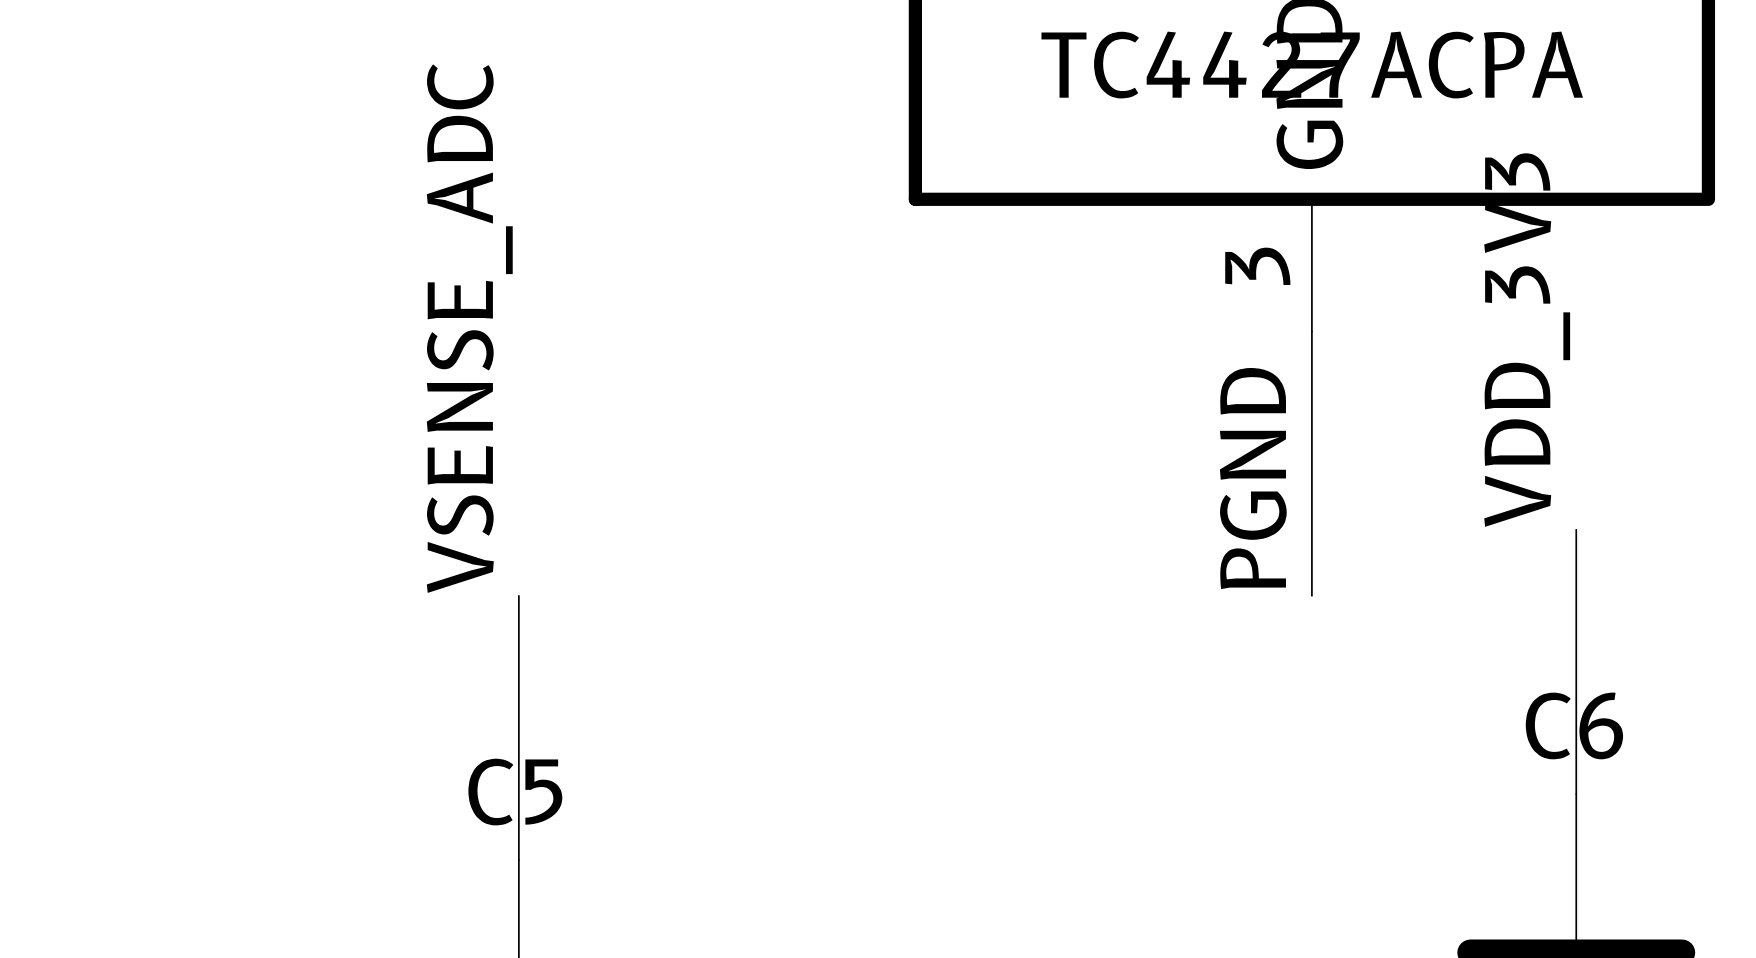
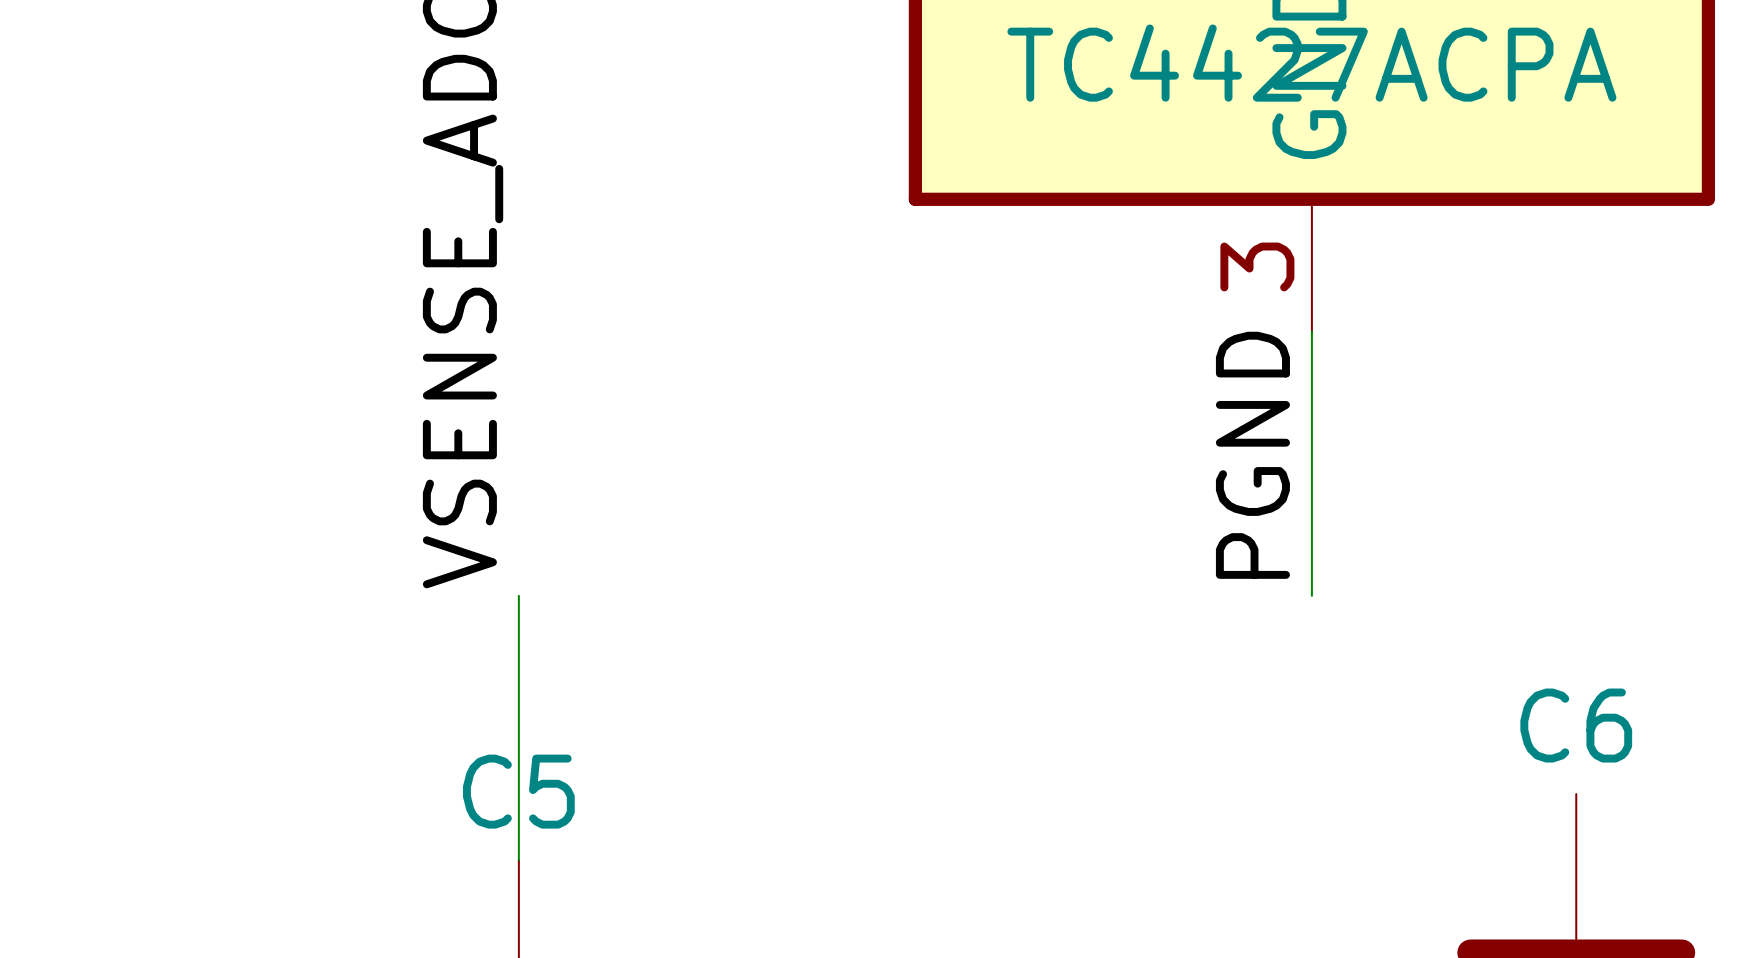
label: VDD_3V3 (1527, 340) -> none
wire: (1576, 529) (1576, 794) -> none

